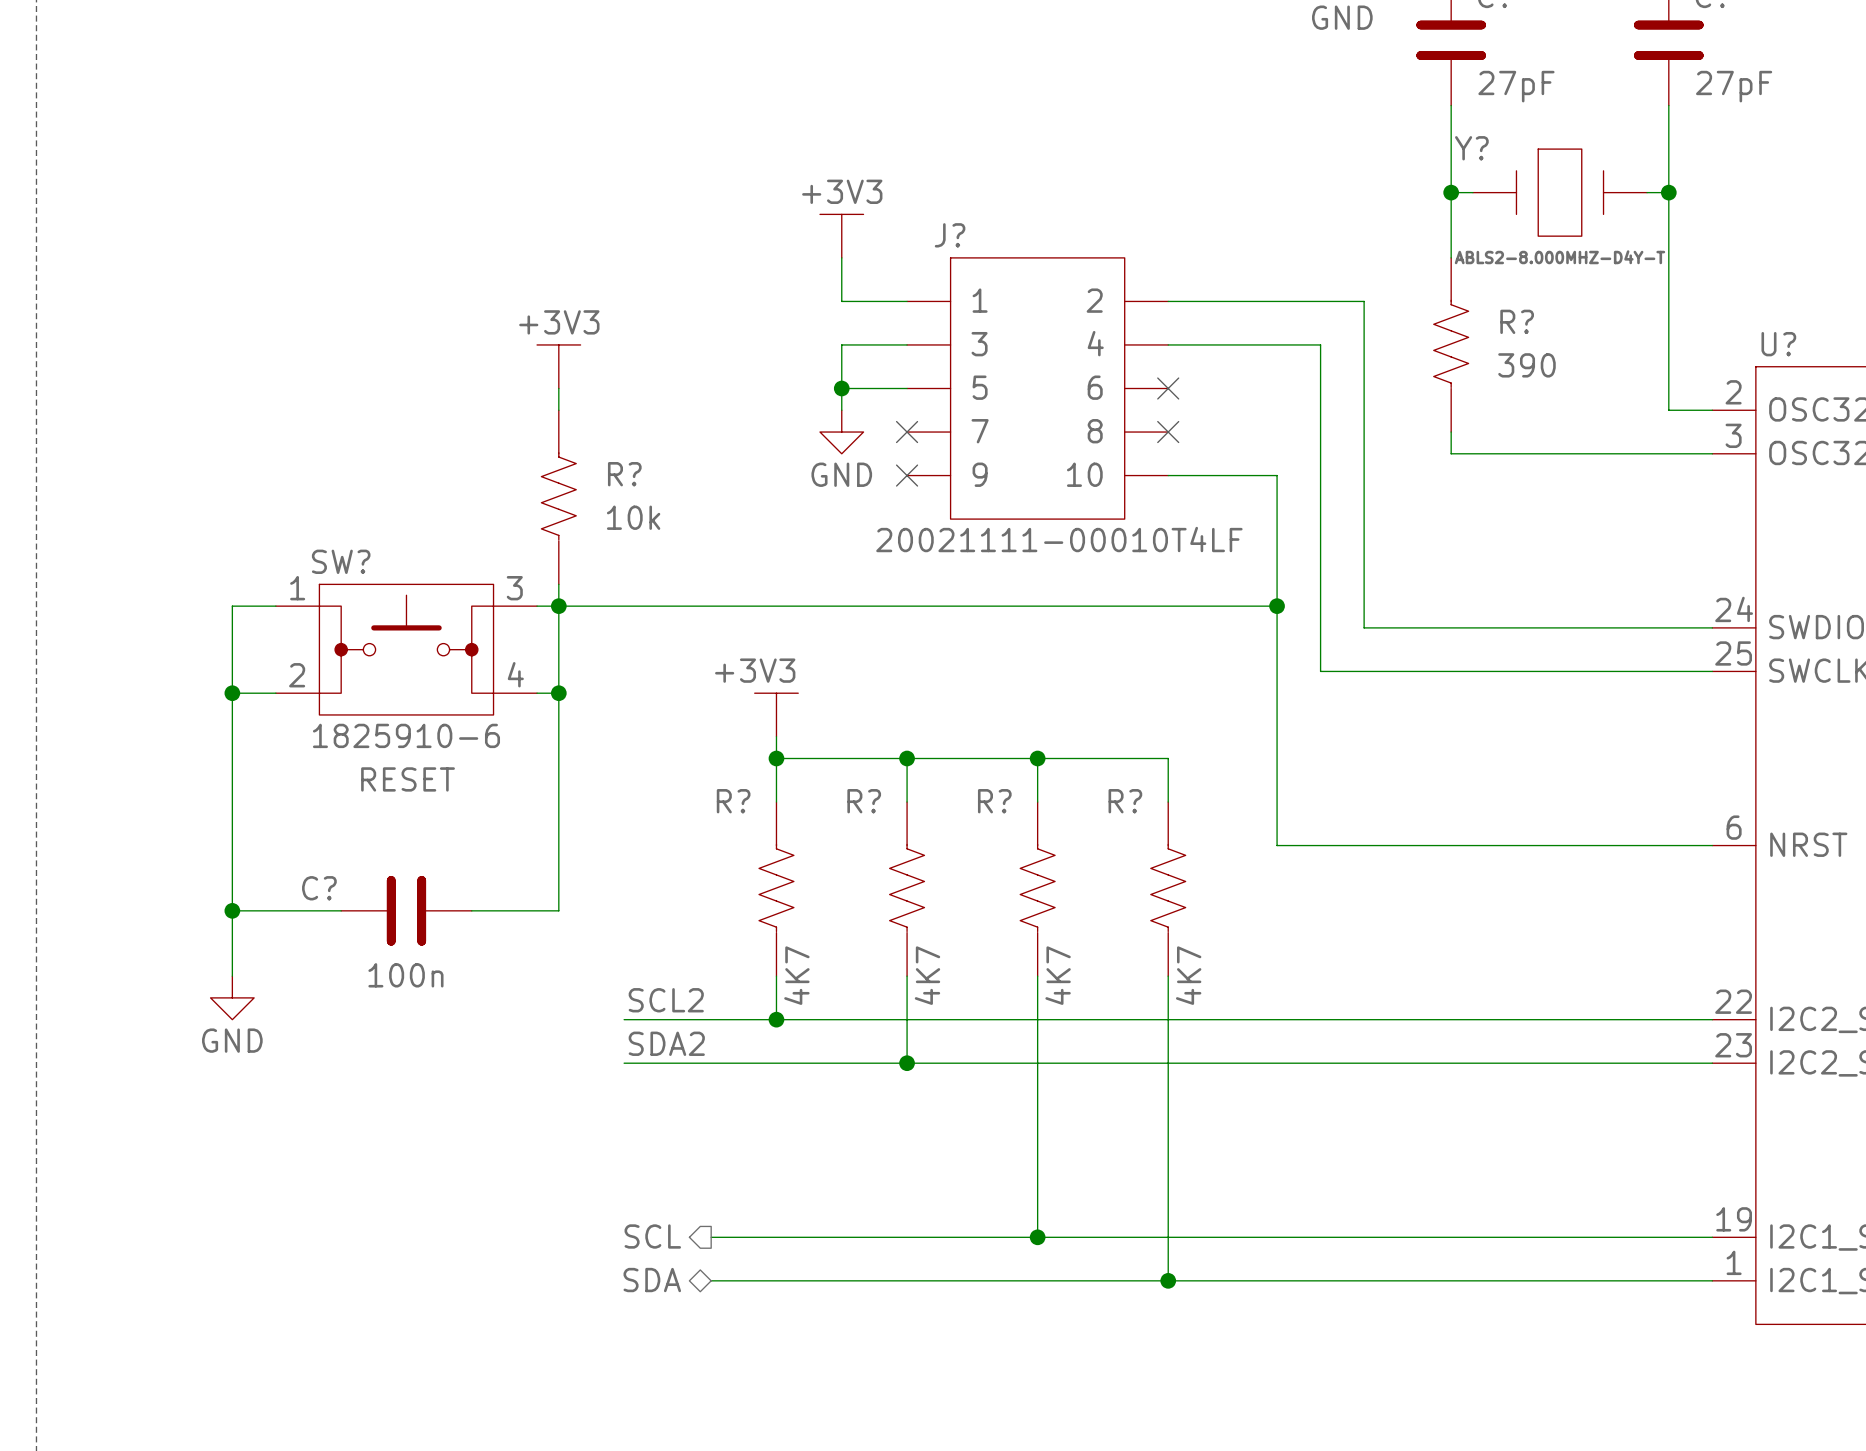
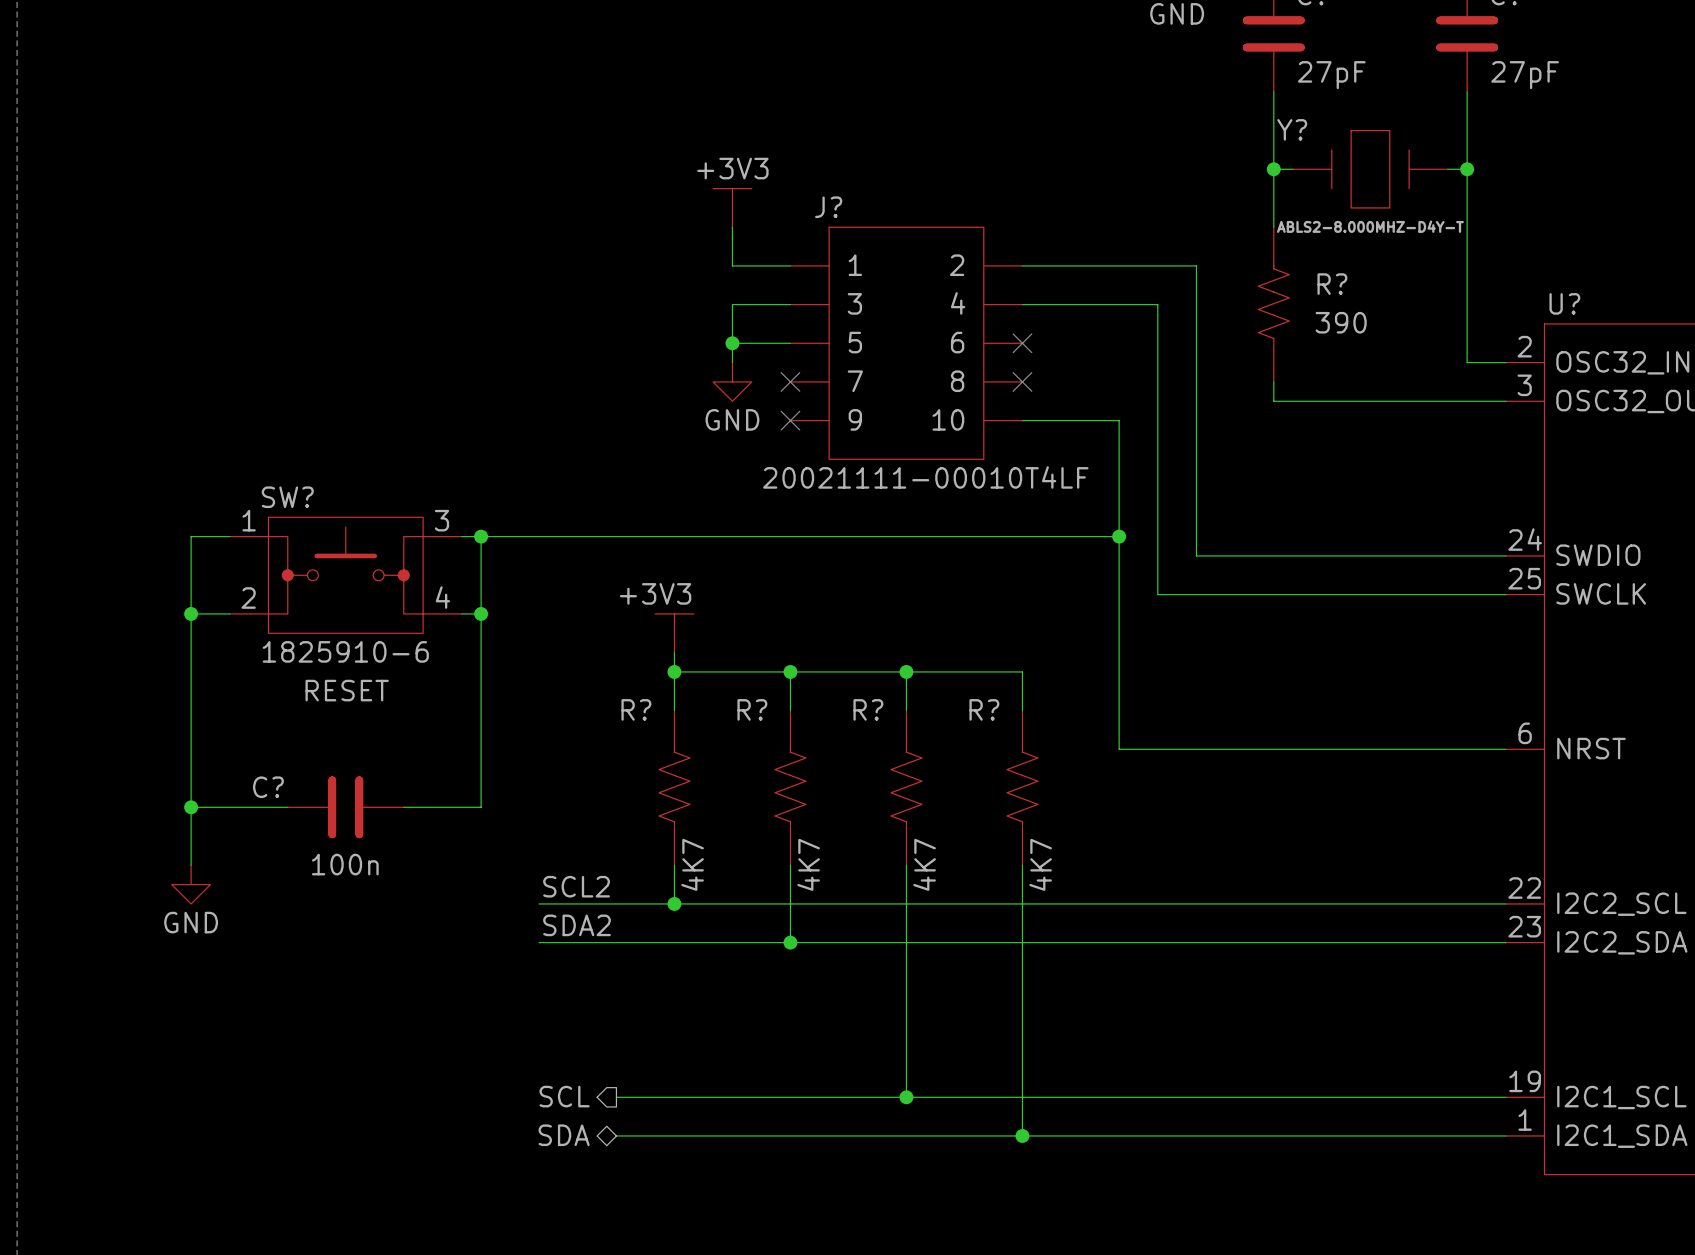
power symbol: +3V3 (558, 366) -> none
wire: (558, 388) (558, 410) -> none
R?: 10k (558, 497) -> none
wire: (558, 584) (558, 606) -> none

